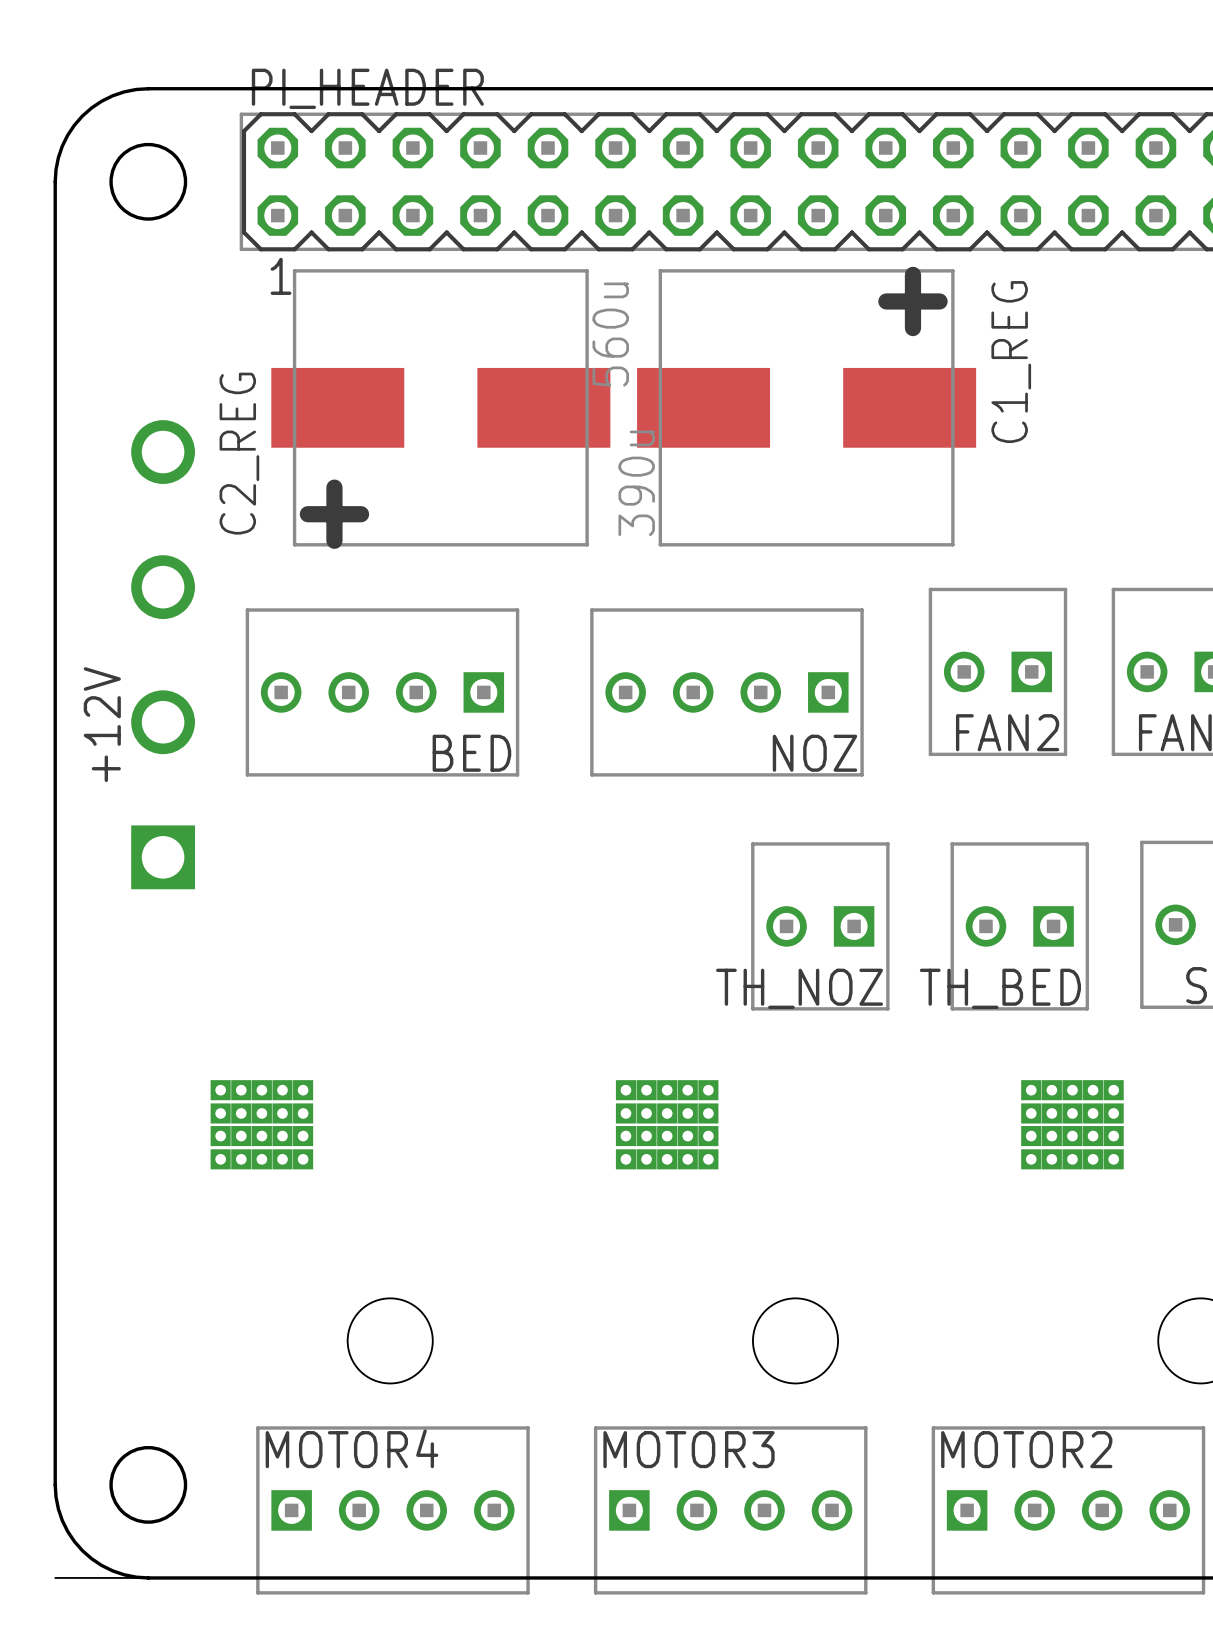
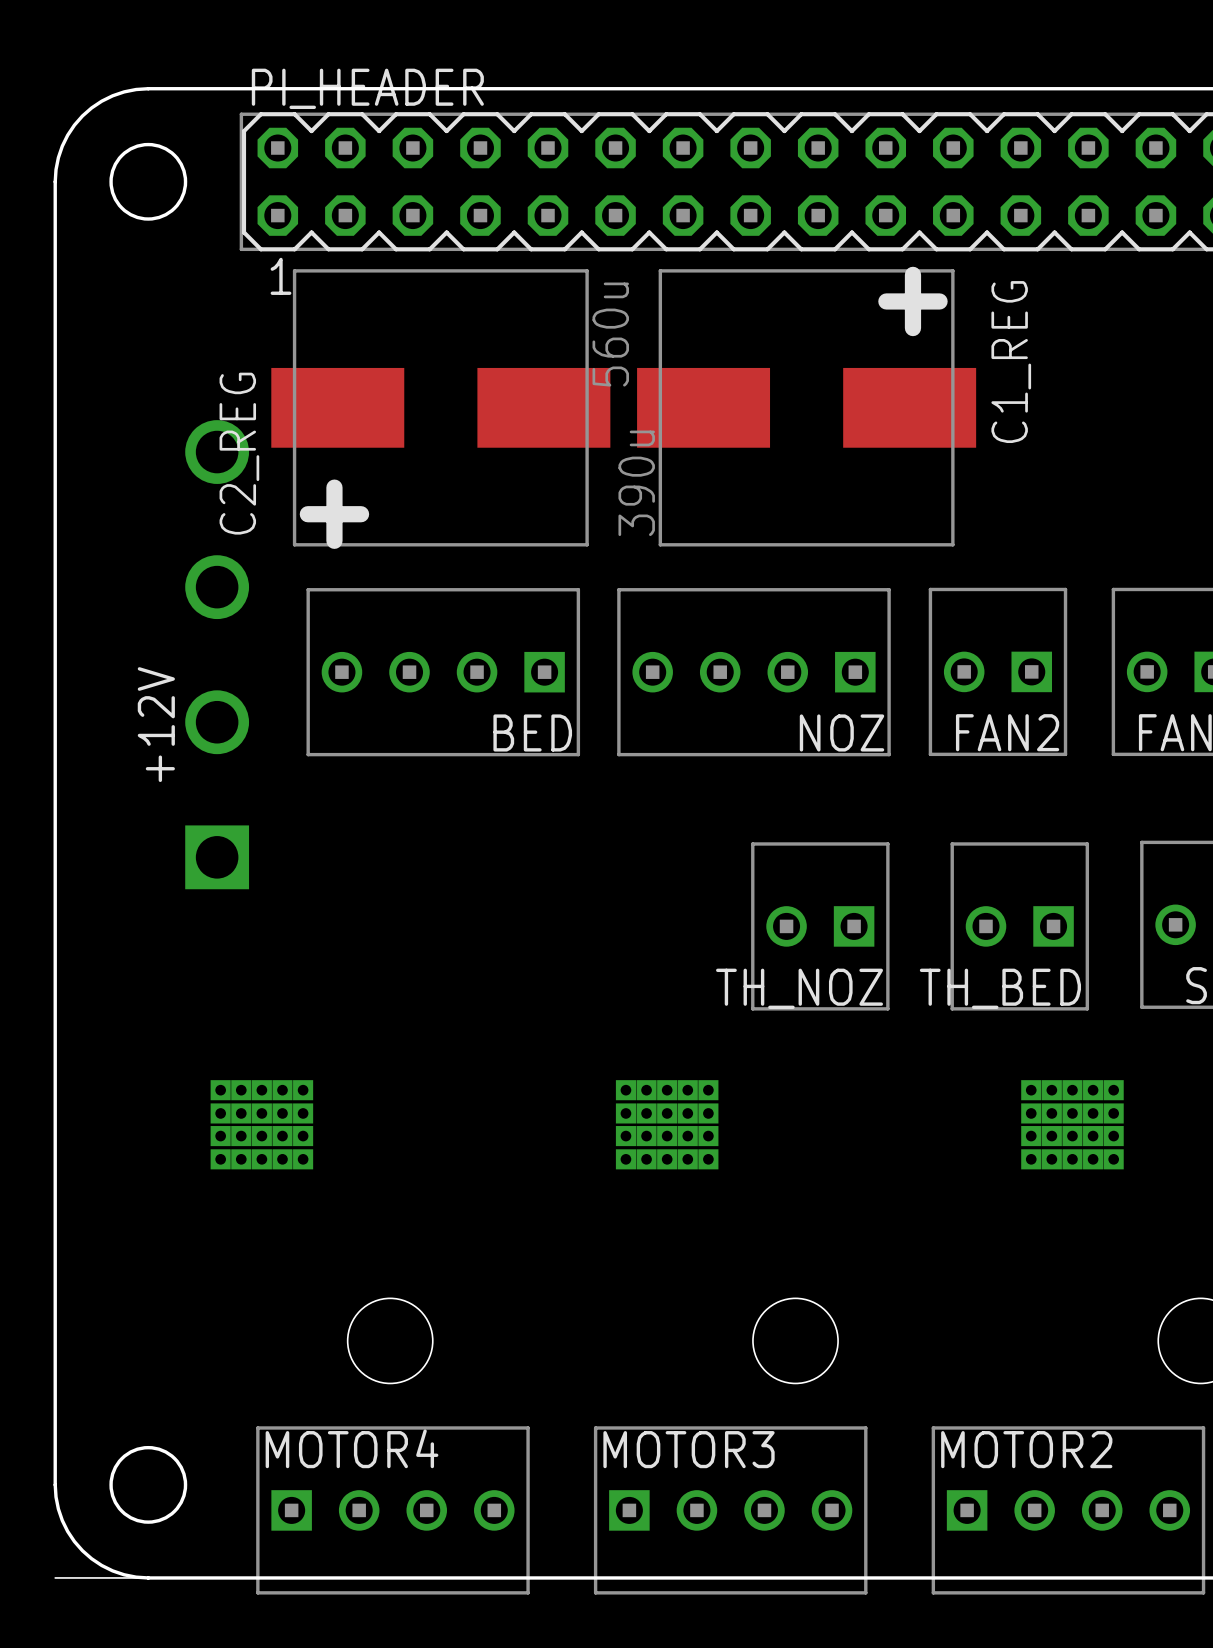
+12V position: (163, 654) -> (217, 654)
BED position: (382, 692) -> (443, 672)
NOZ position: (726, 692) -> (754, 672)

